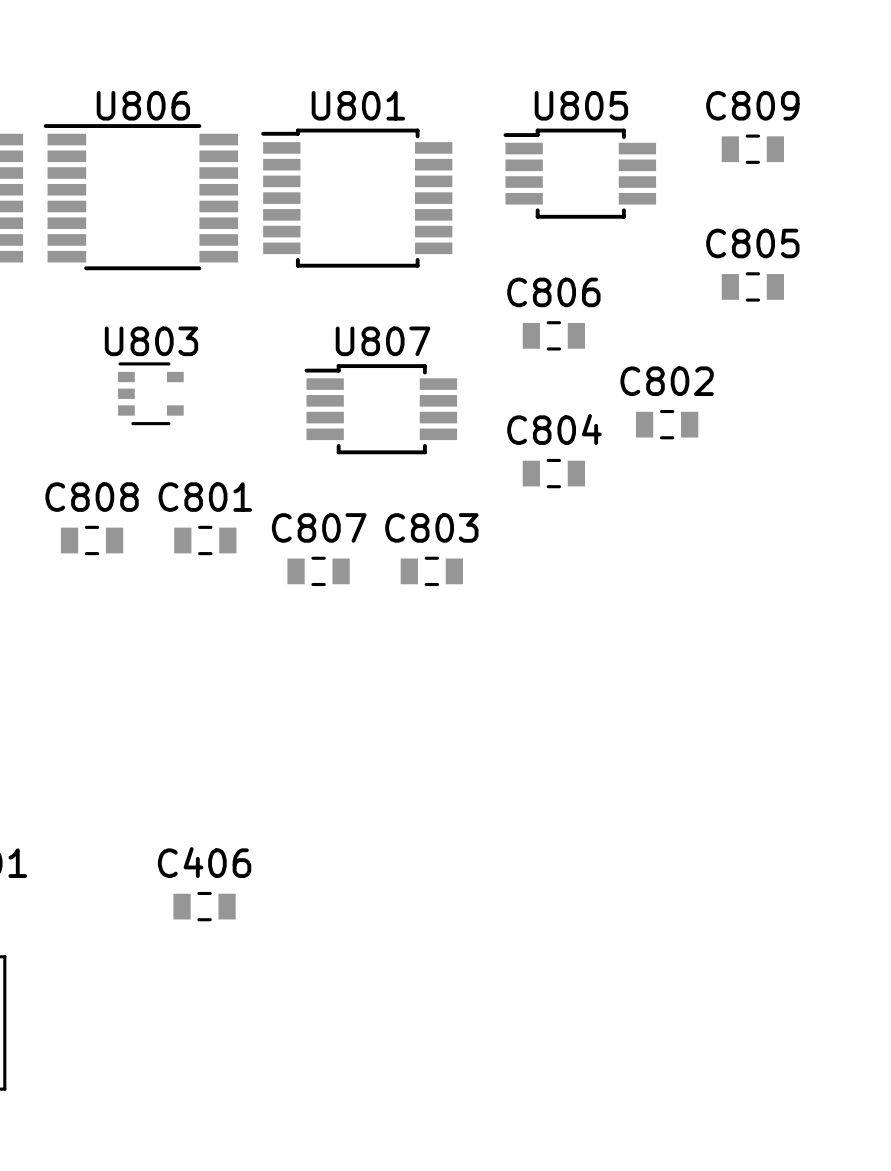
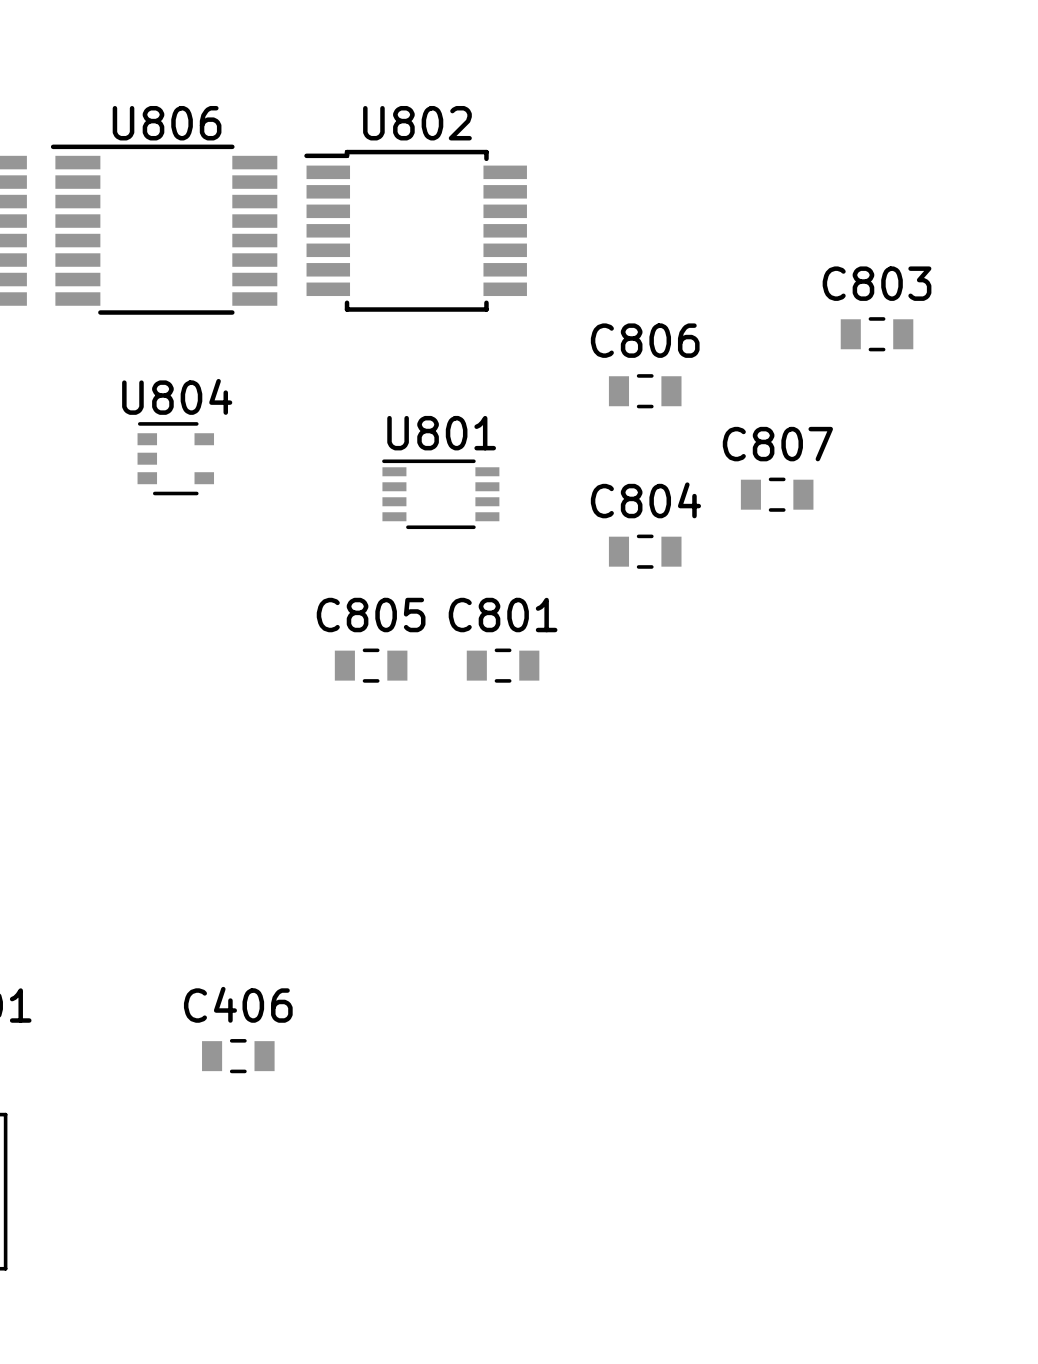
U801 name: U801 (358, 105) -> U802 (417, 123)
C809: (752, 149) -> none
U805: (579, 173) -> none
C805 name: C805 (752, 243) -> C803 (877, 283)
U803 name: U803 (151, 341) -> U804 (177, 396)
C802 name: C802 (667, 381) -> C807 (777, 444)
U807: (380, 409) -> none
U801: none -> (440, 494)
C807 name: C807 (319, 527) -> C805 (371, 615)
C803 name: C803 (431, 527) -> C801 (503, 615)
C808: (92, 540) -> none
C801: (205, 540) -> none

